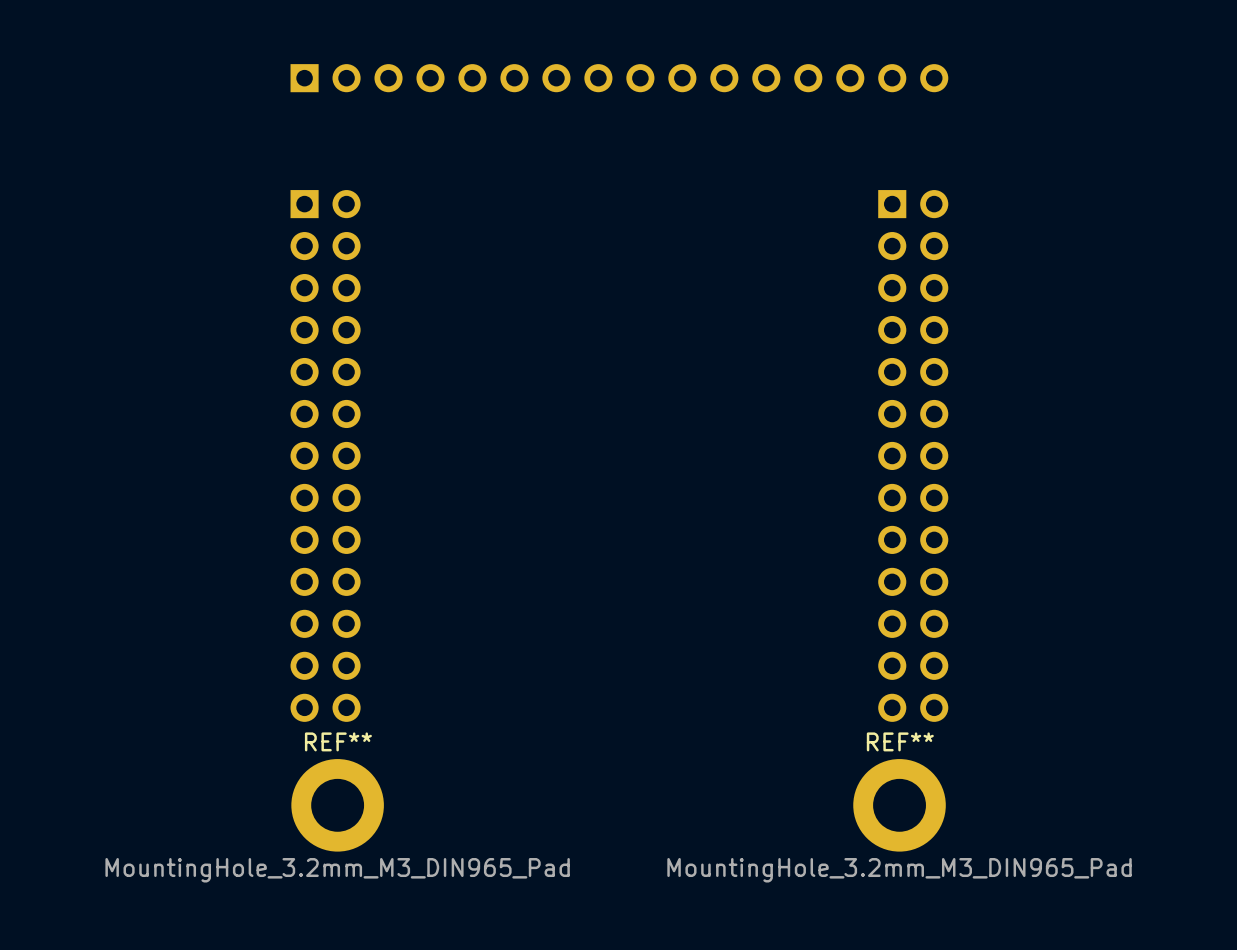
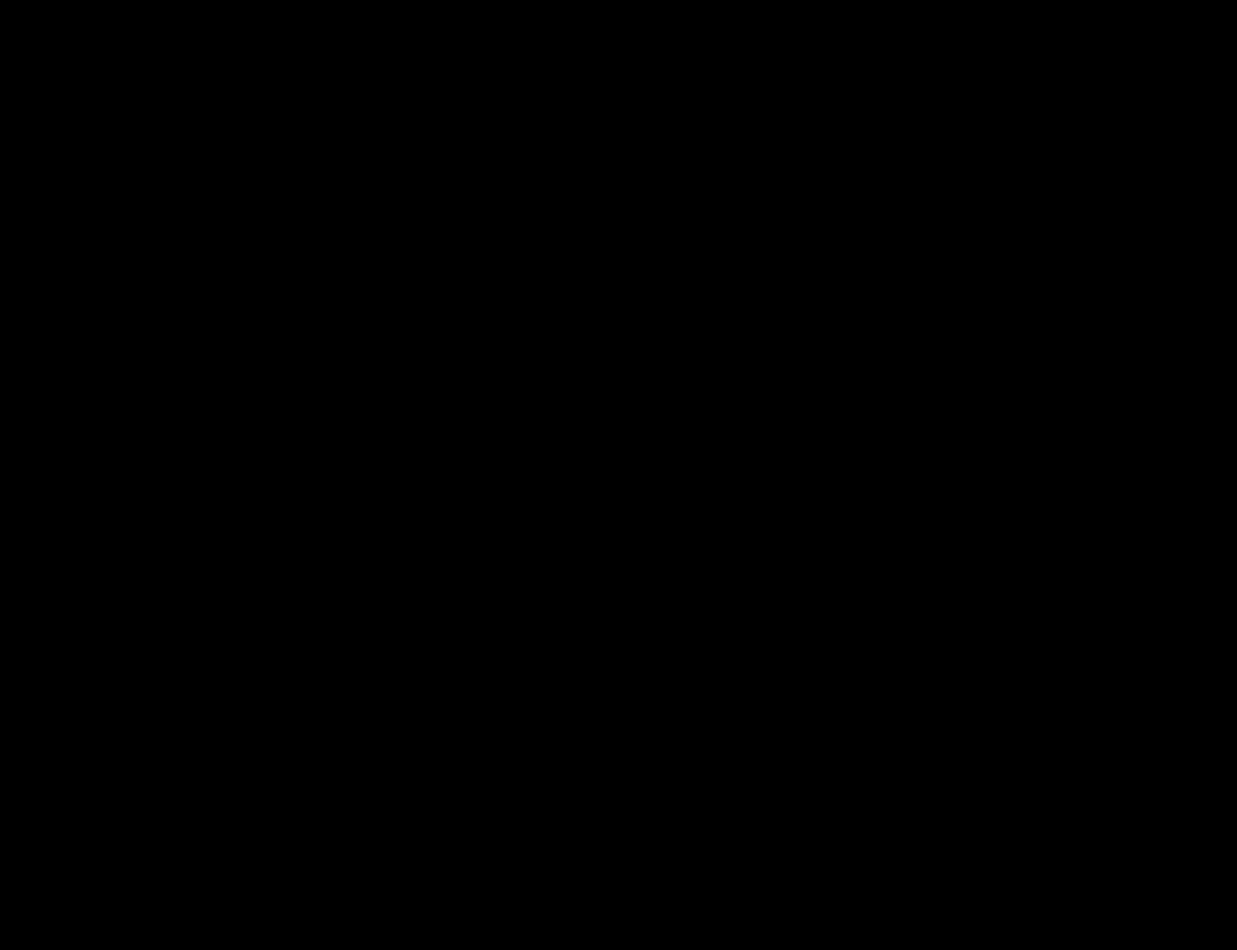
part: (619, 78) -> none
part: (325, 455) -> none
part: (913, 455) -> none
REF**: MountingHole_3.2mm_M3_DIN965_Pad (337, 805) -> none
REF**: MountingHole_3.2mm_M3_DIN965_Pad (899, 805) -> none

